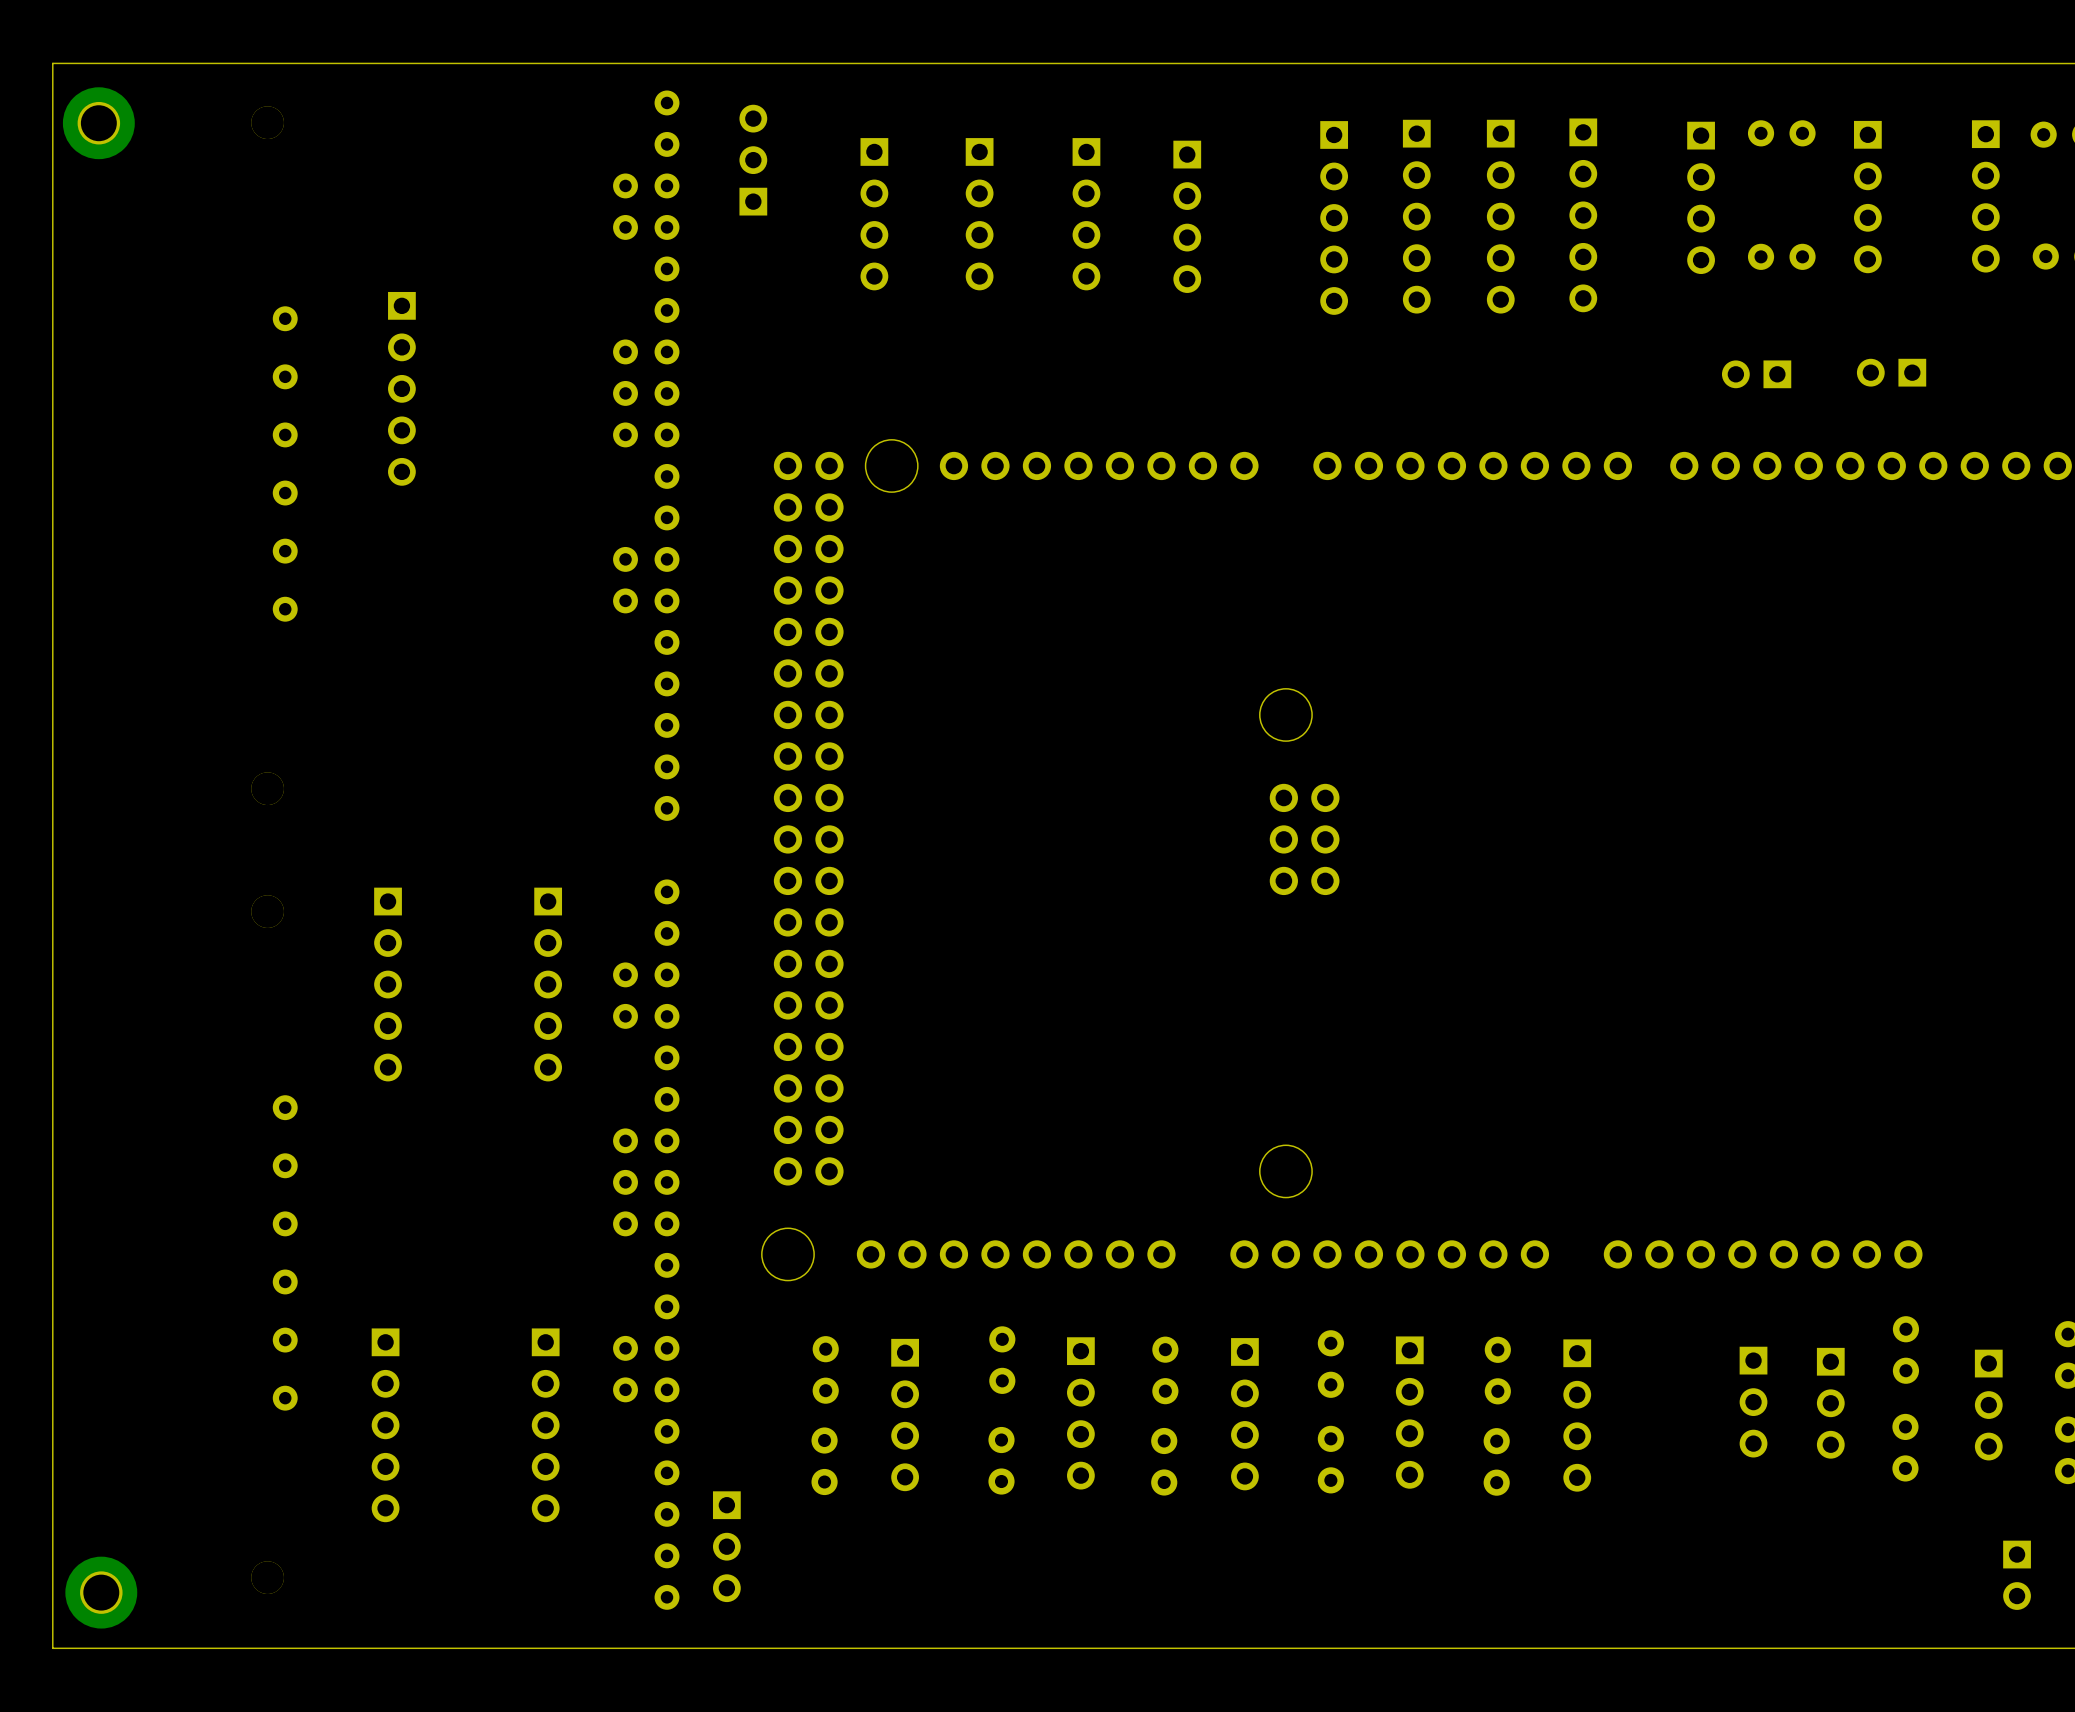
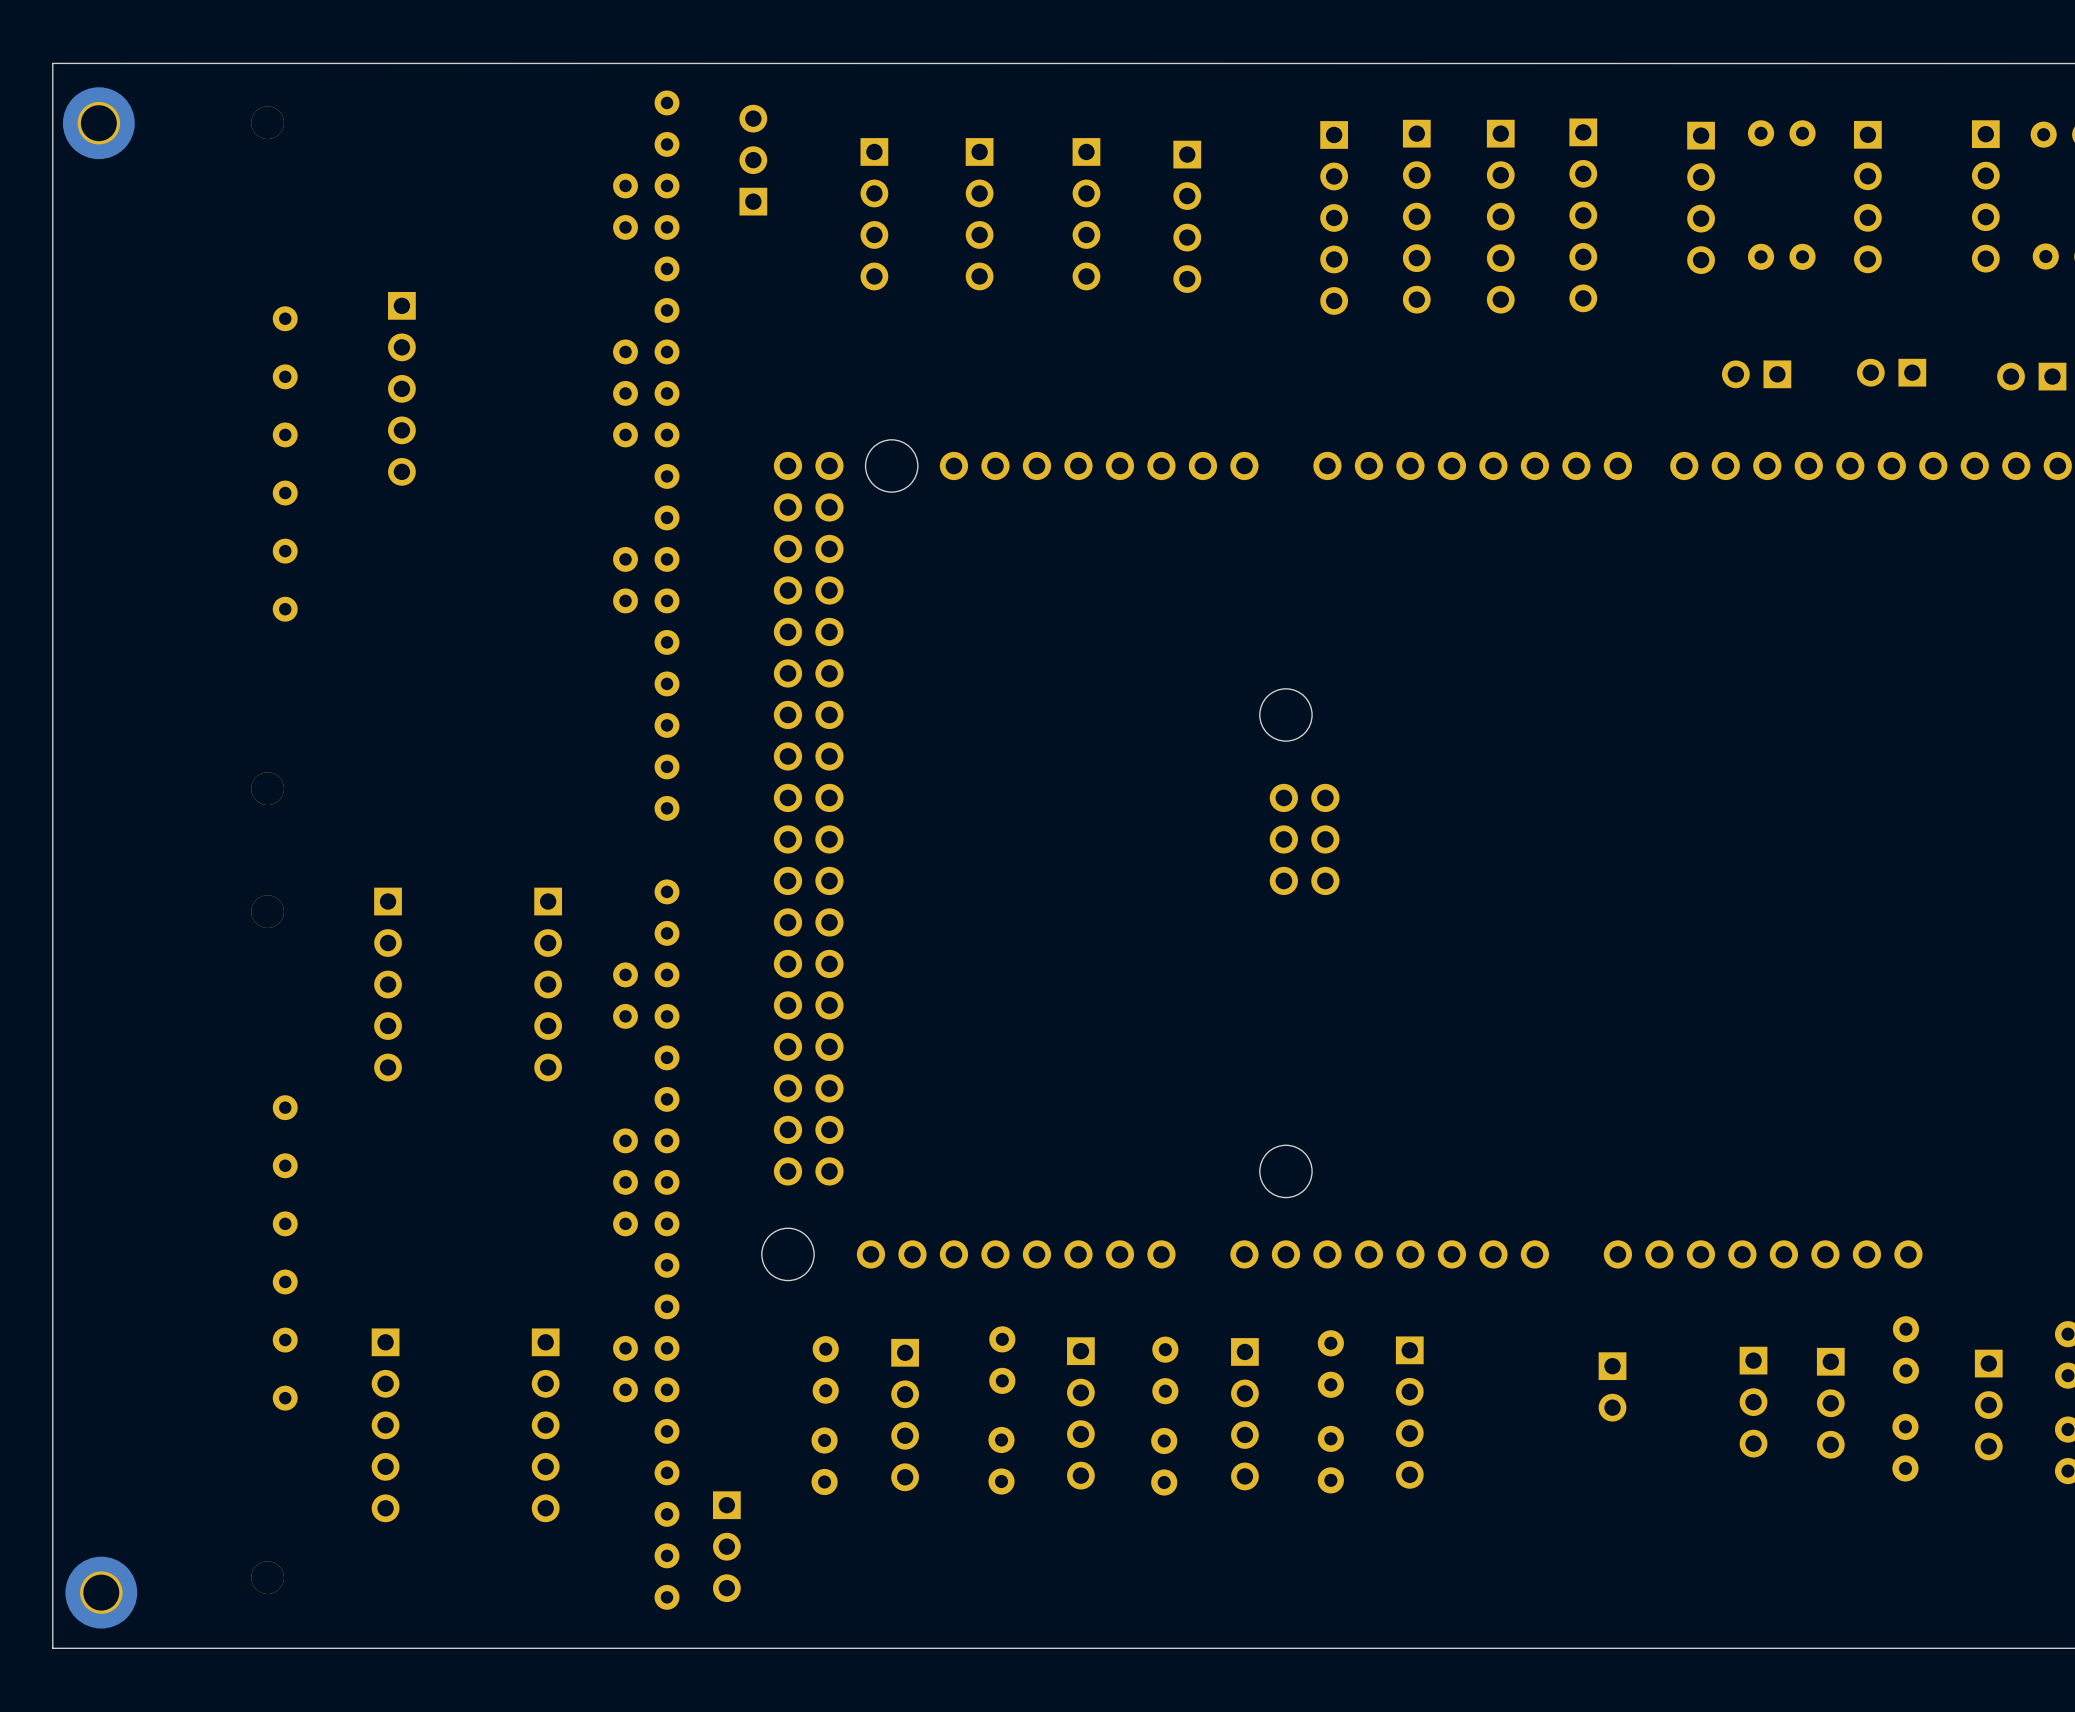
part: none -> (2031, 376)
part: (1497, 1370) -> none
part: none -> (1612, 1386)
part: (1577, 1415) -> none
part: (1496, 1461) -> none
part: (2017, 1575) -> none

